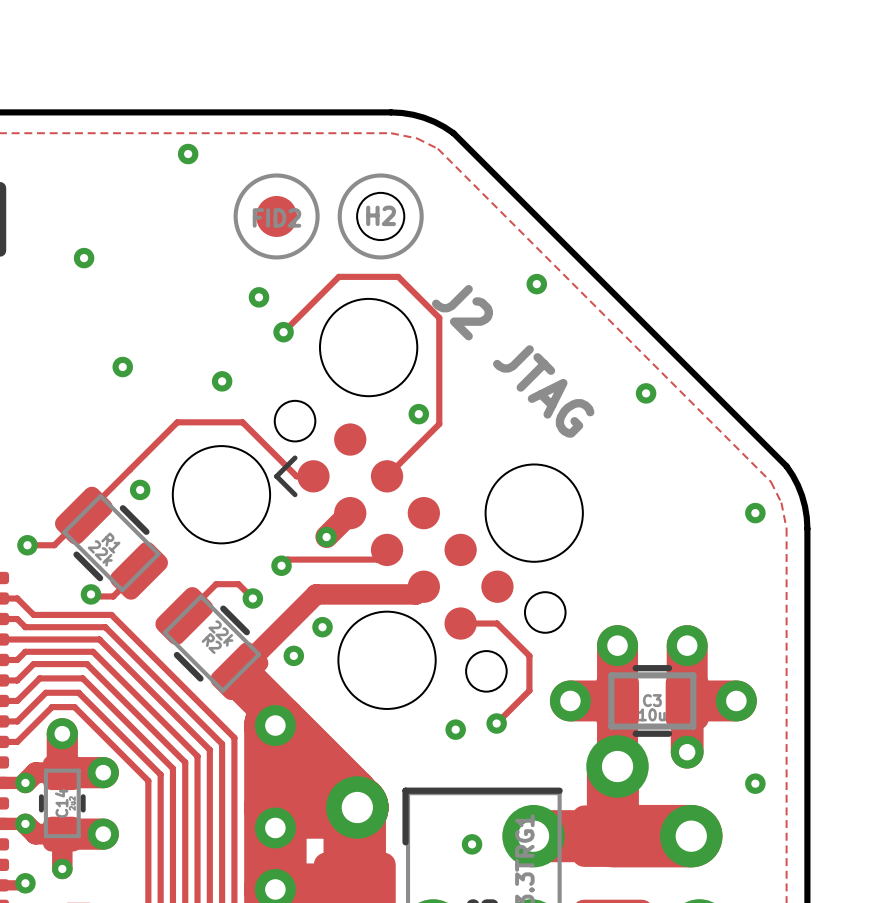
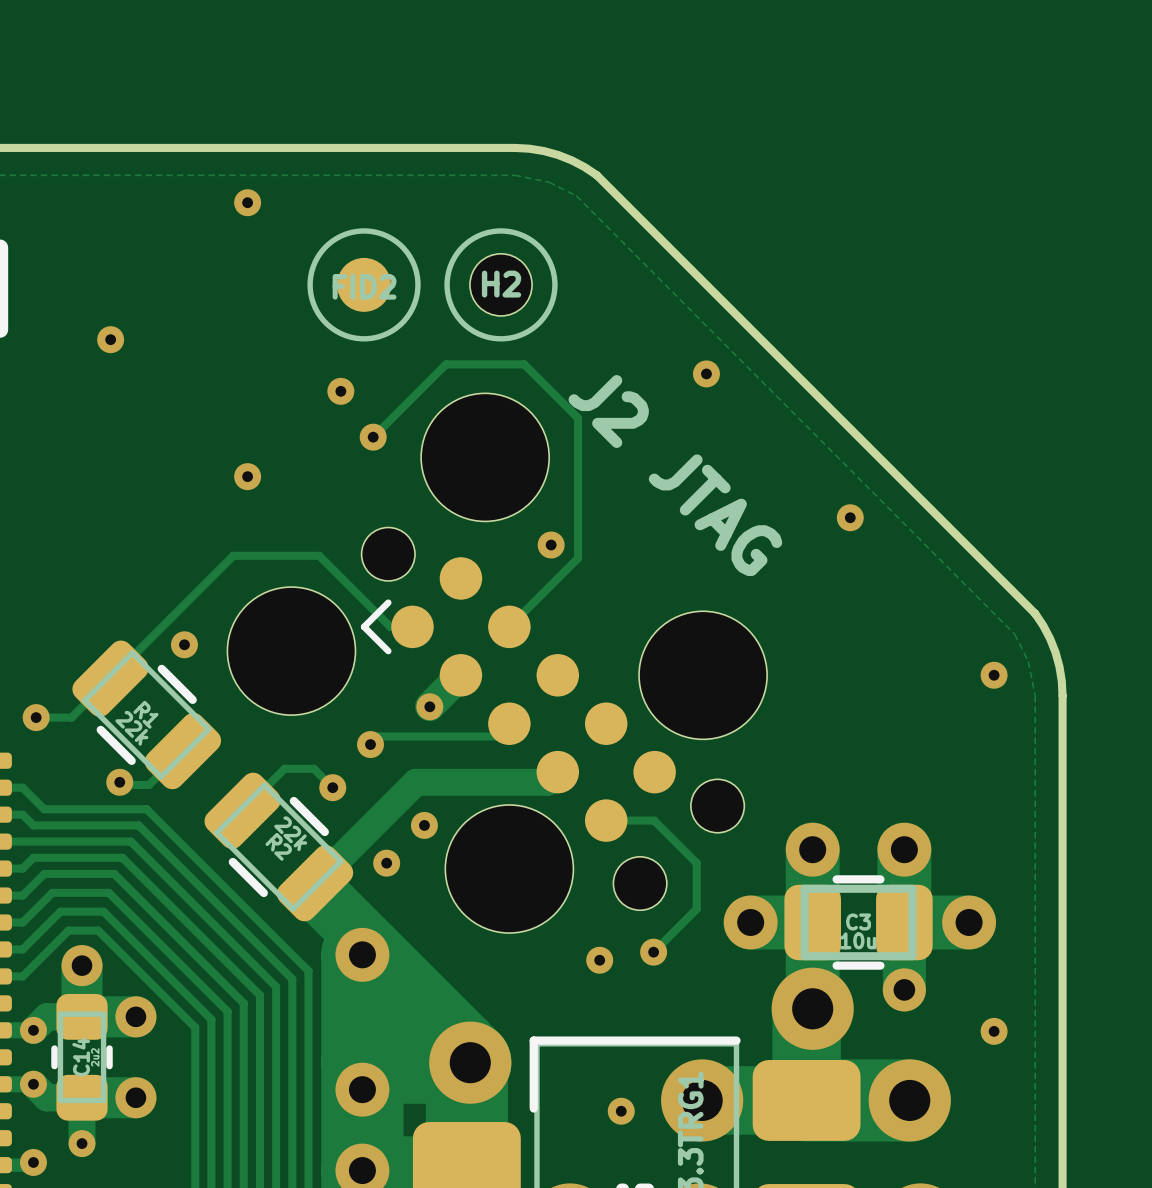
via: none -> (247, 476)
via: (122, 367) -> none
via: (222, 381) -> none

